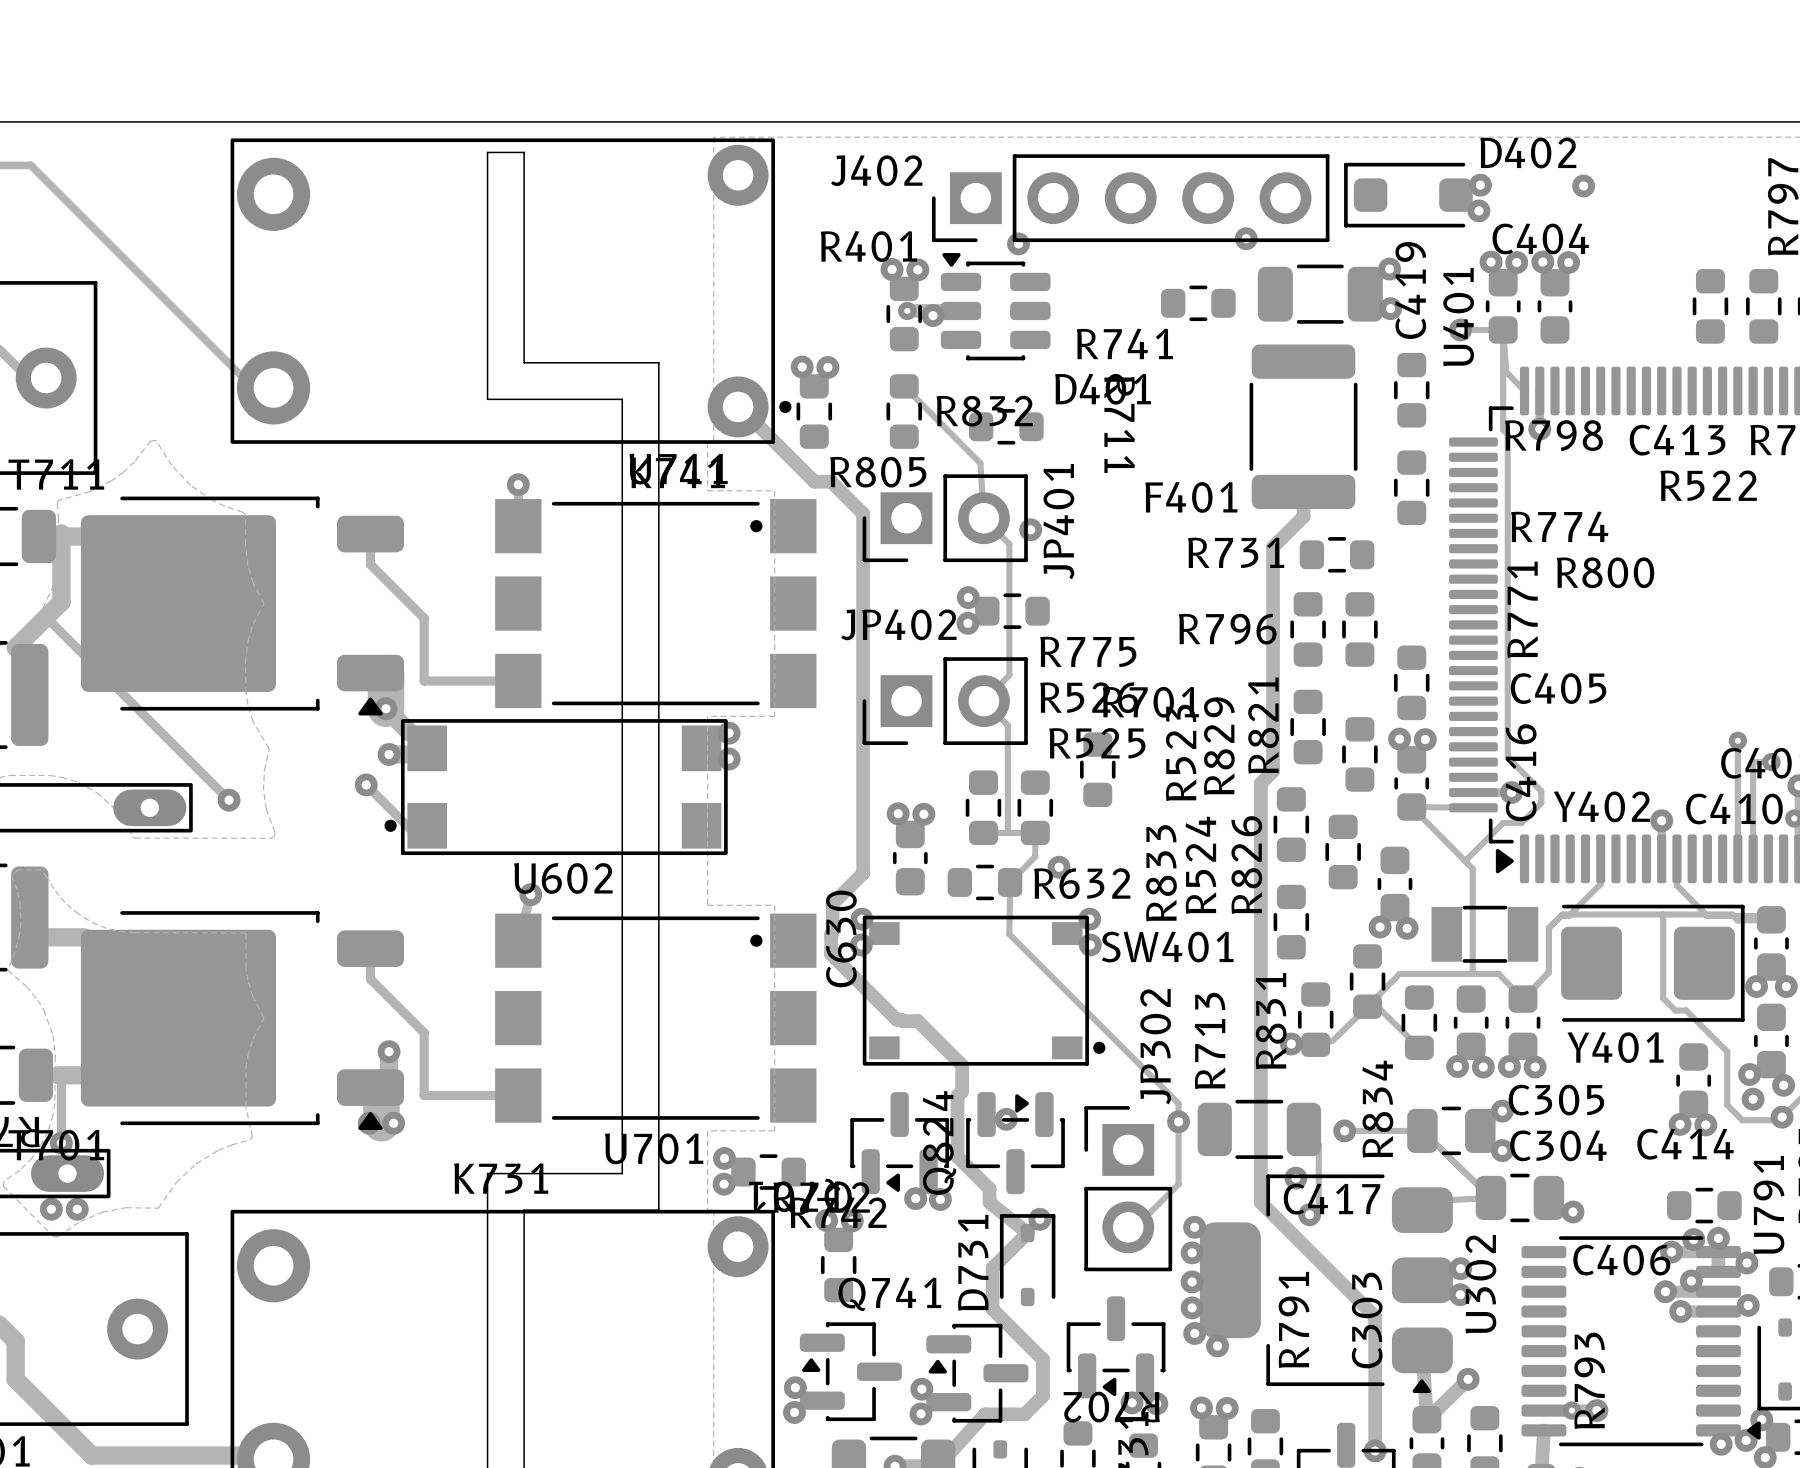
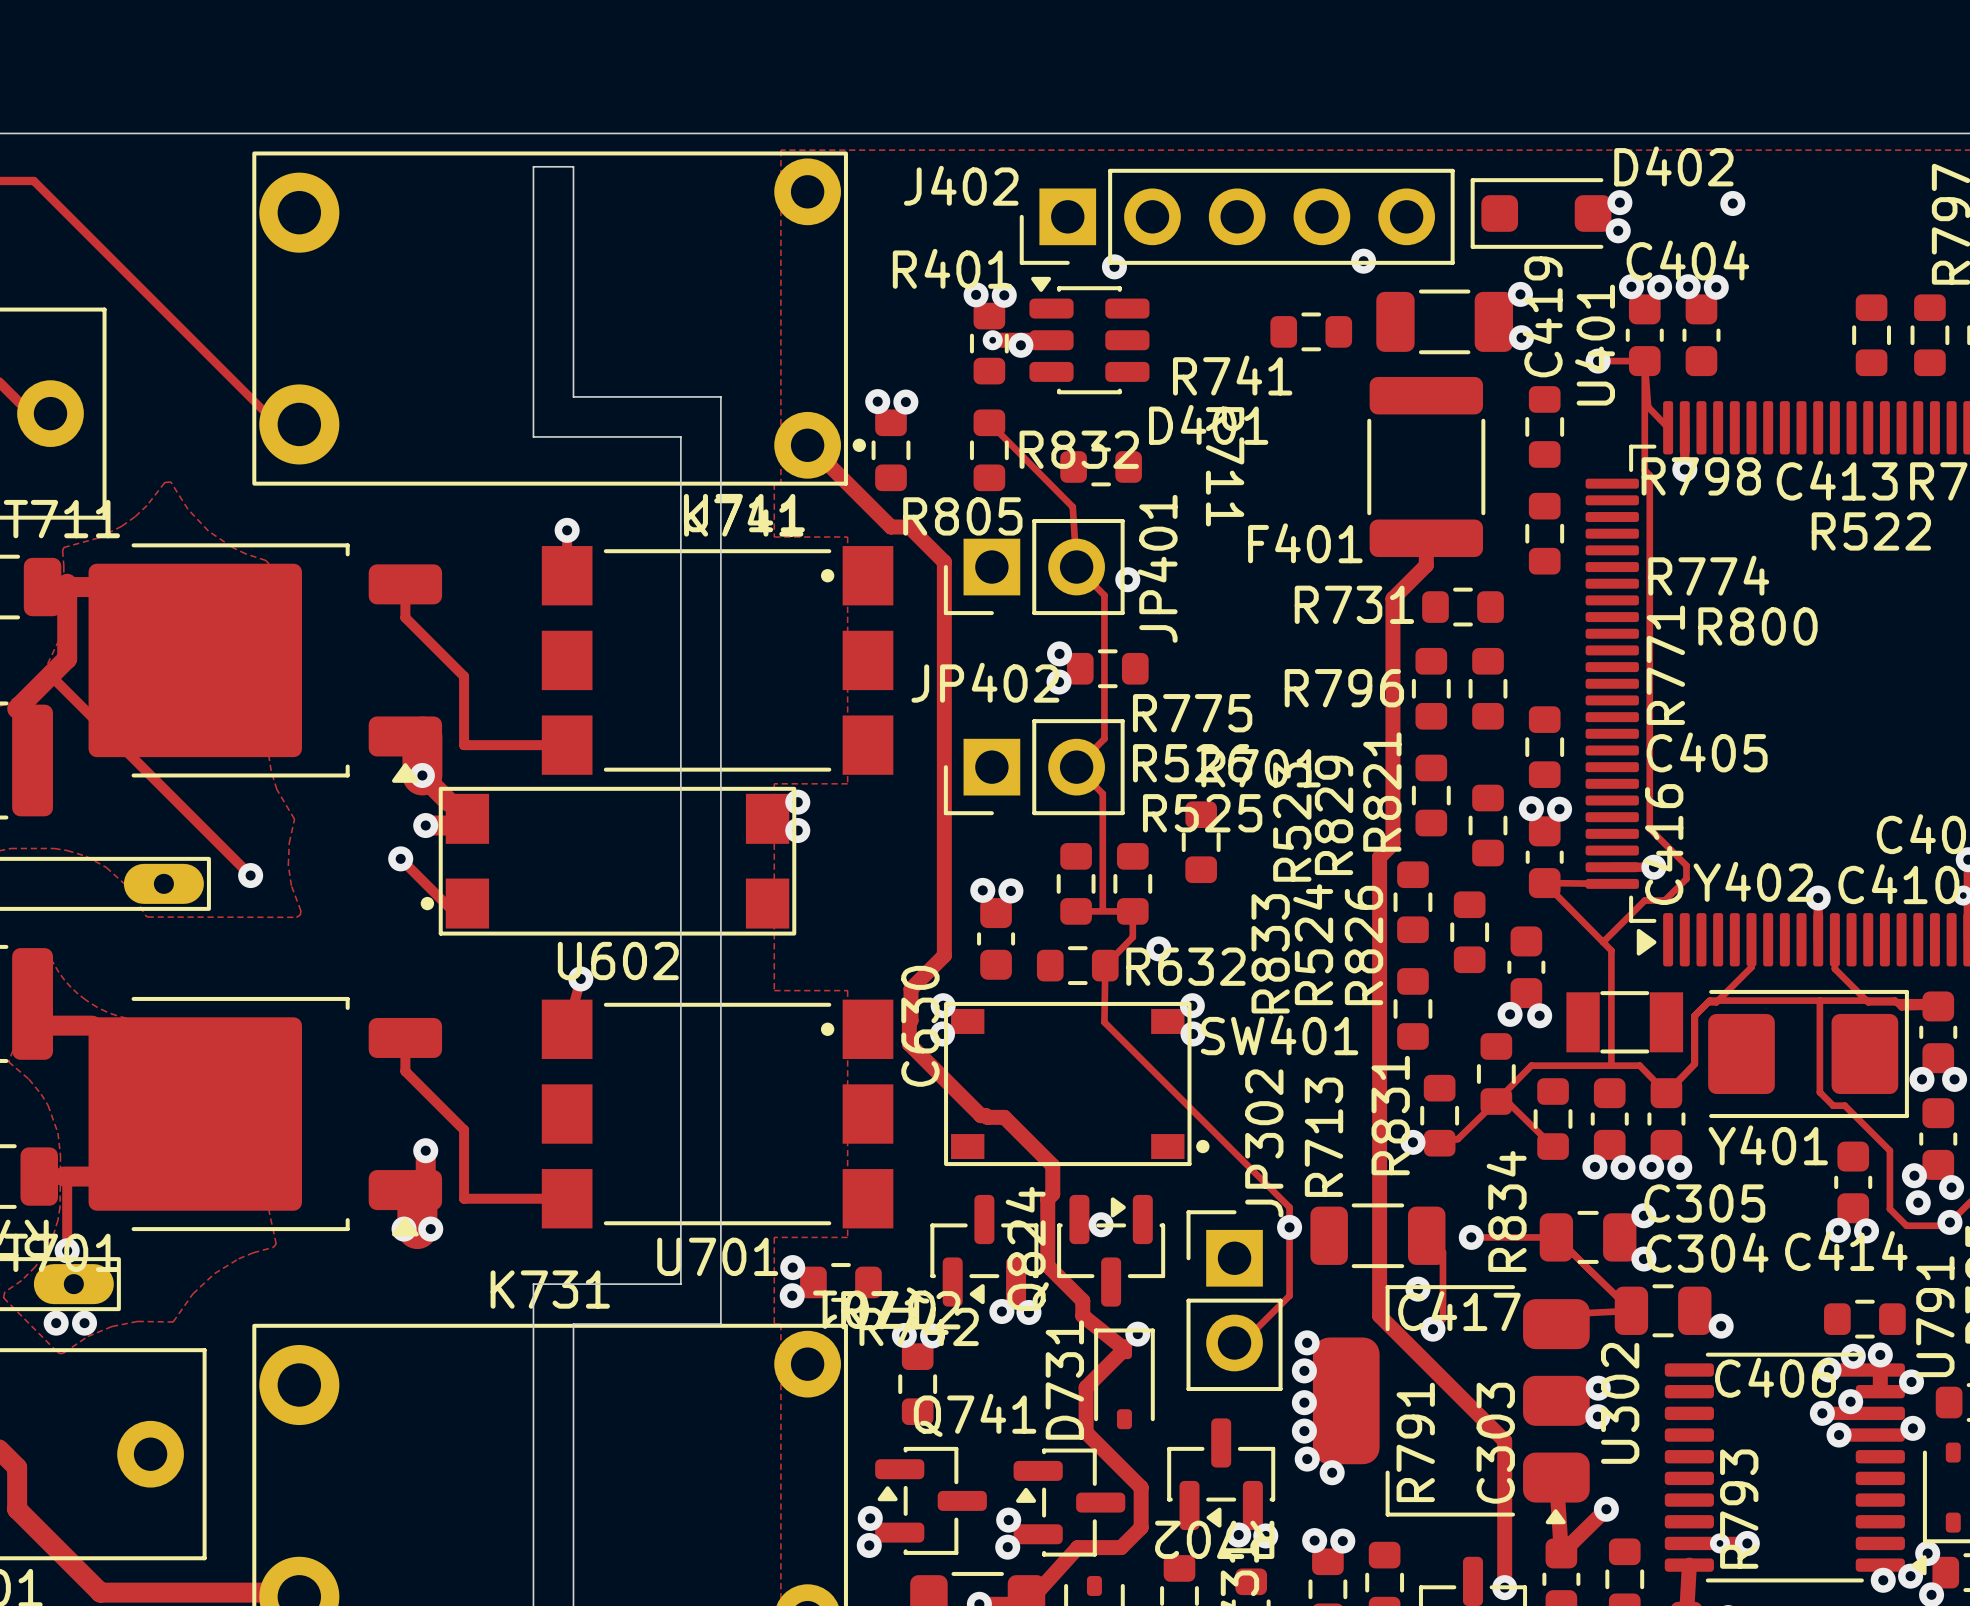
track: (1737, 740) (1737, 858) -> none
via: (1737, 740) -> none
track: (1771, 762) (1753, 762) (1753, 858) -> none
via: (1771, 762) -> none

